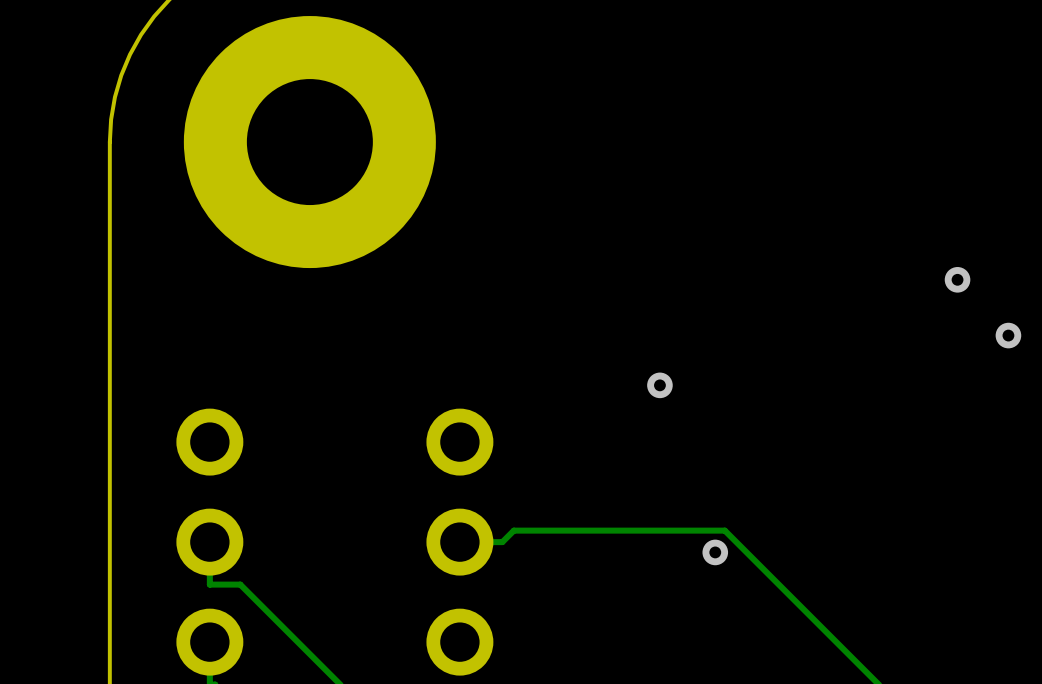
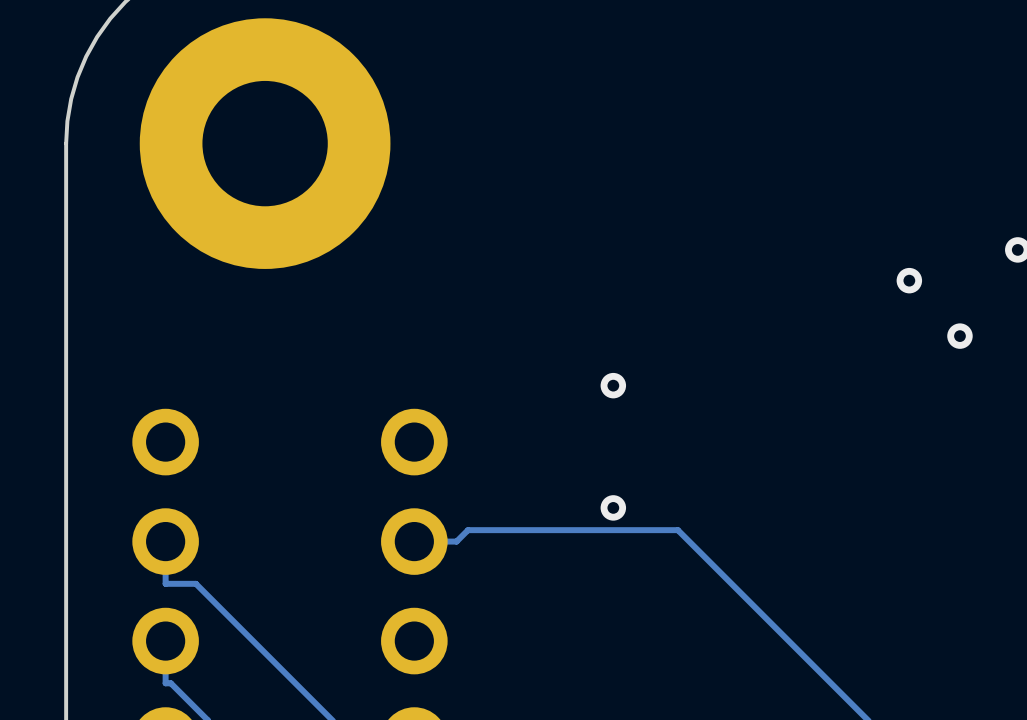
via position: (715, 552) -> (613, 507)

